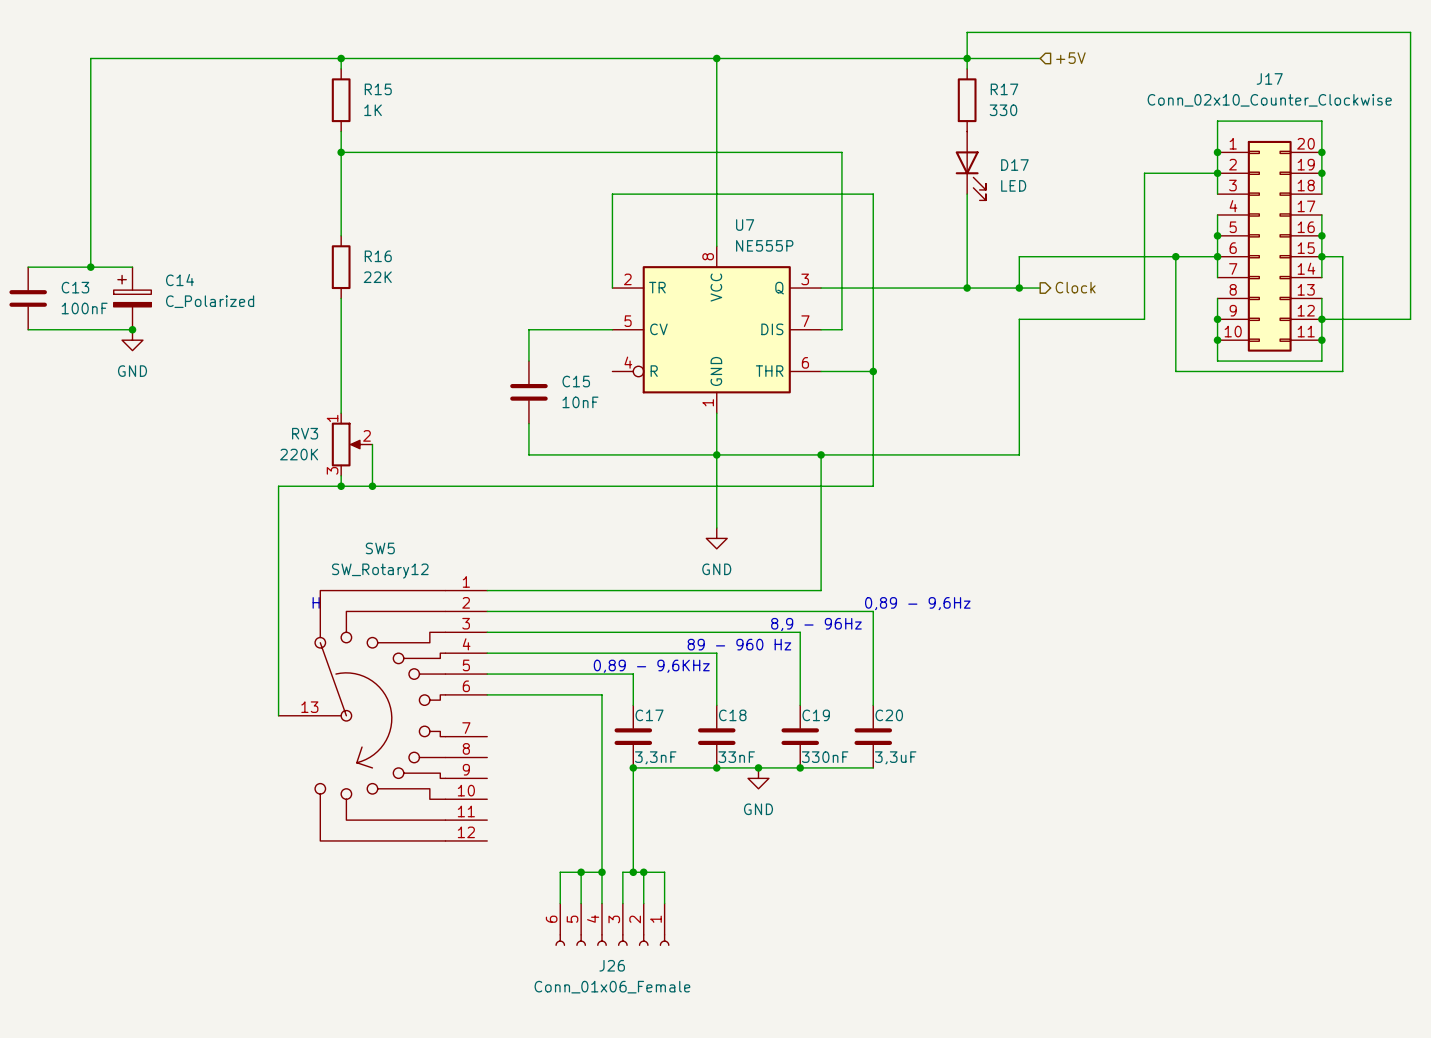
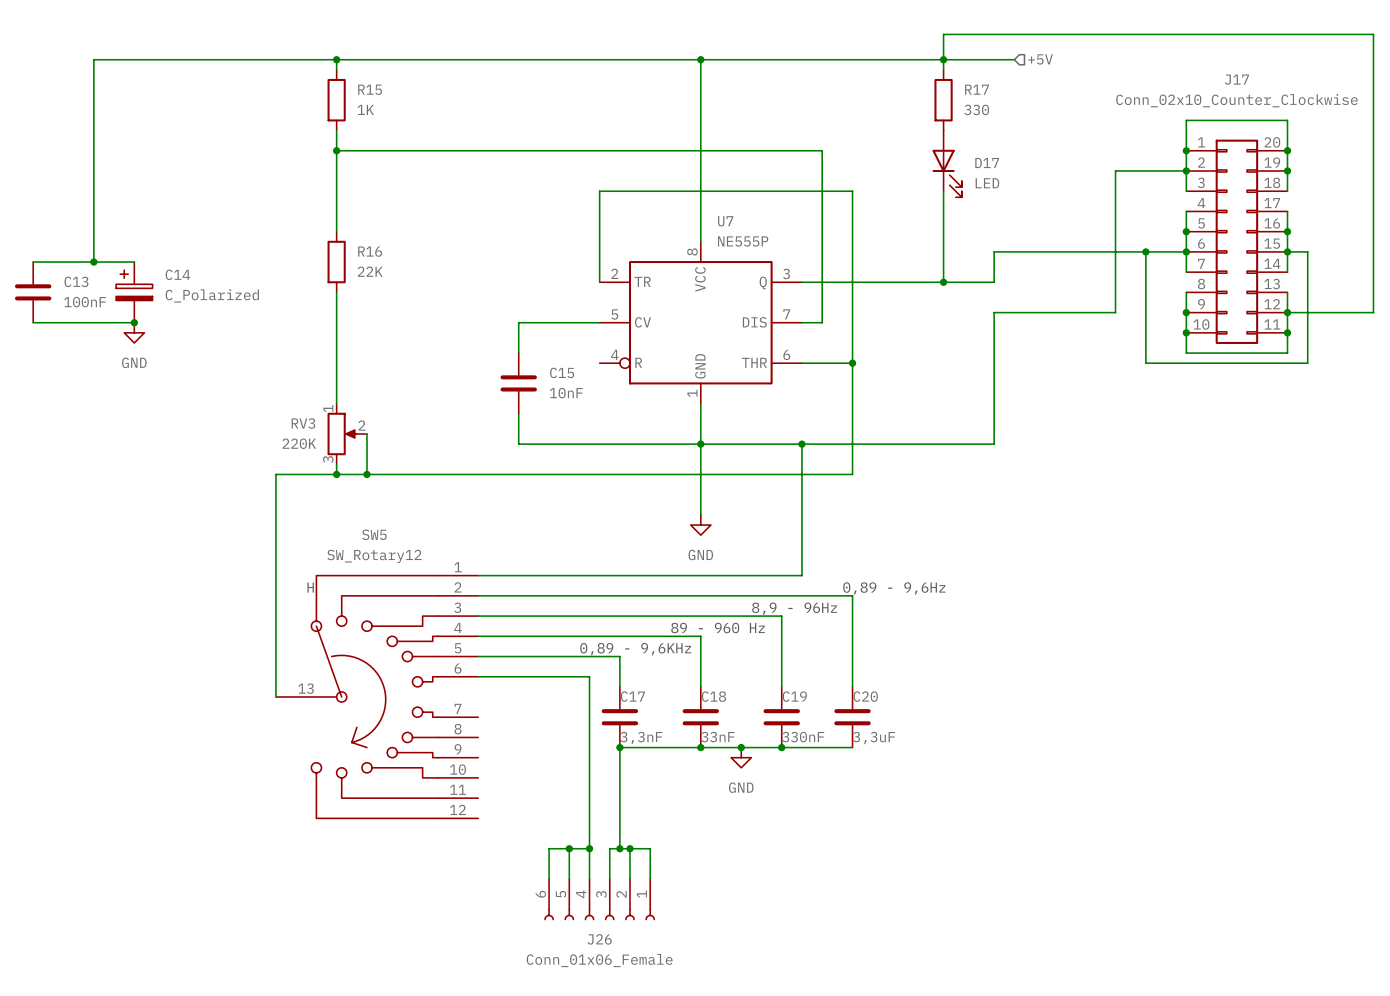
hierarchical label: Clock (1075, 287) -> none
wire: (1019, 288) (1040, 288) -> none
junction: (1019, 288) -> none

